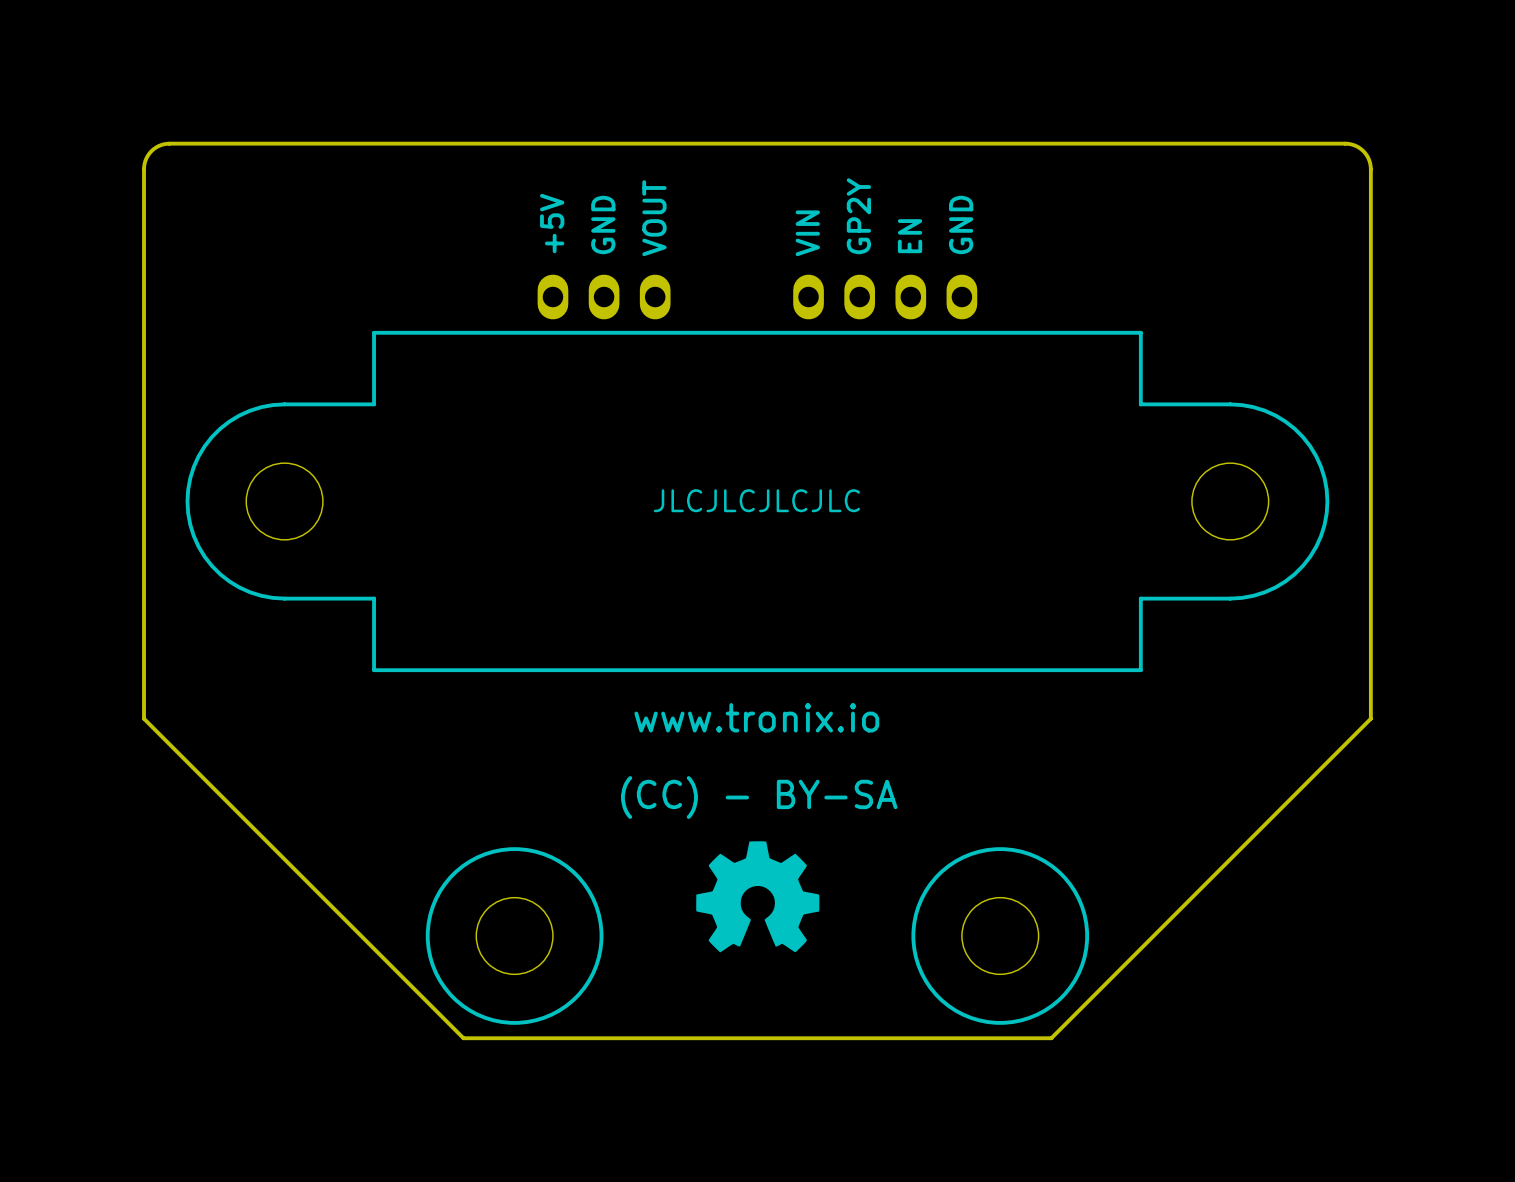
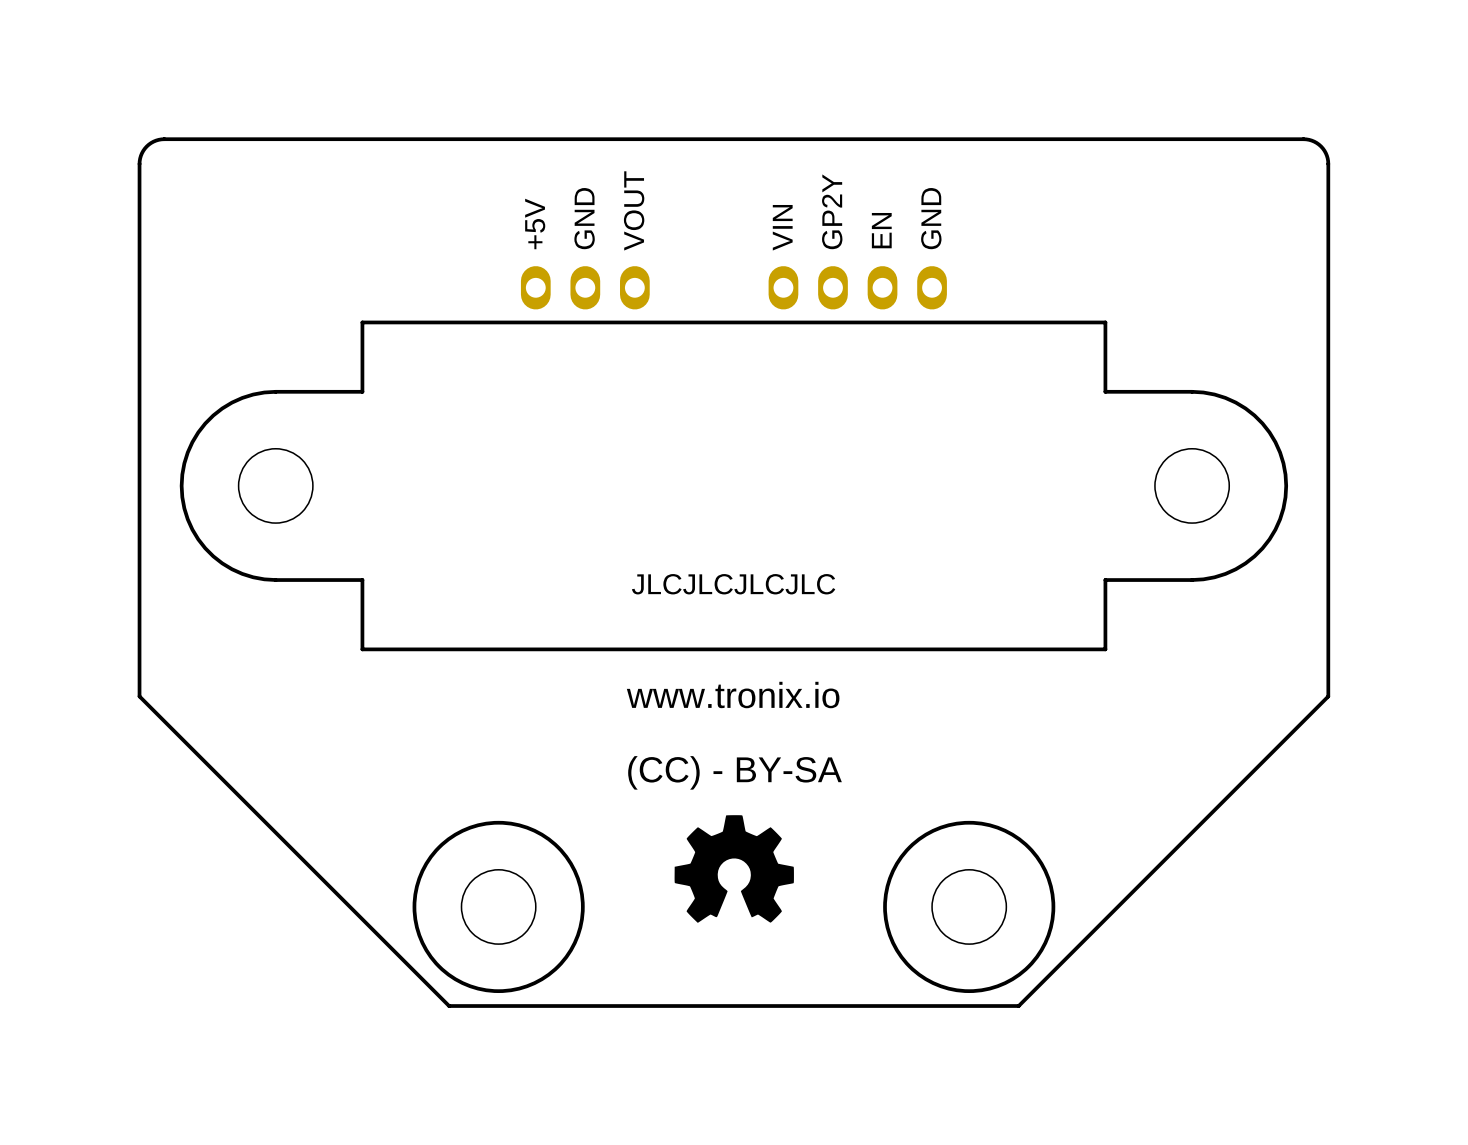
text position: JLCJLCJLCJLC (756, 500) -> JLCJLCJLCJLC (733, 584)

